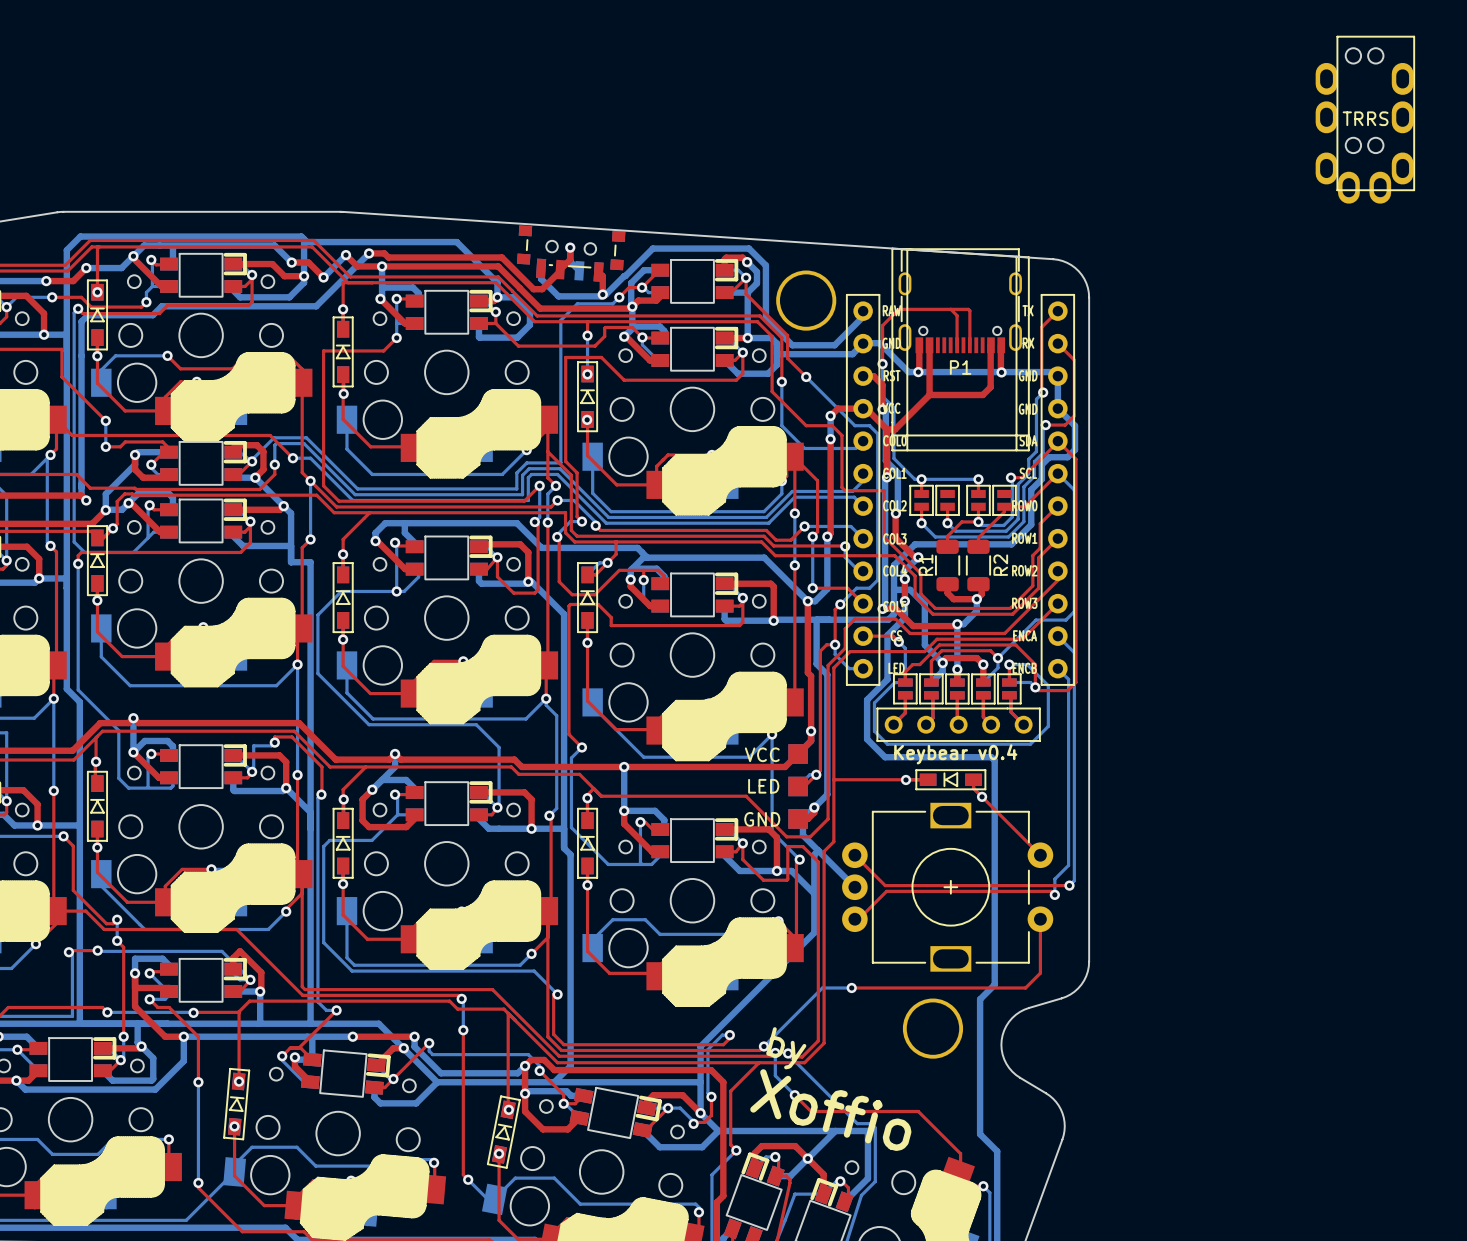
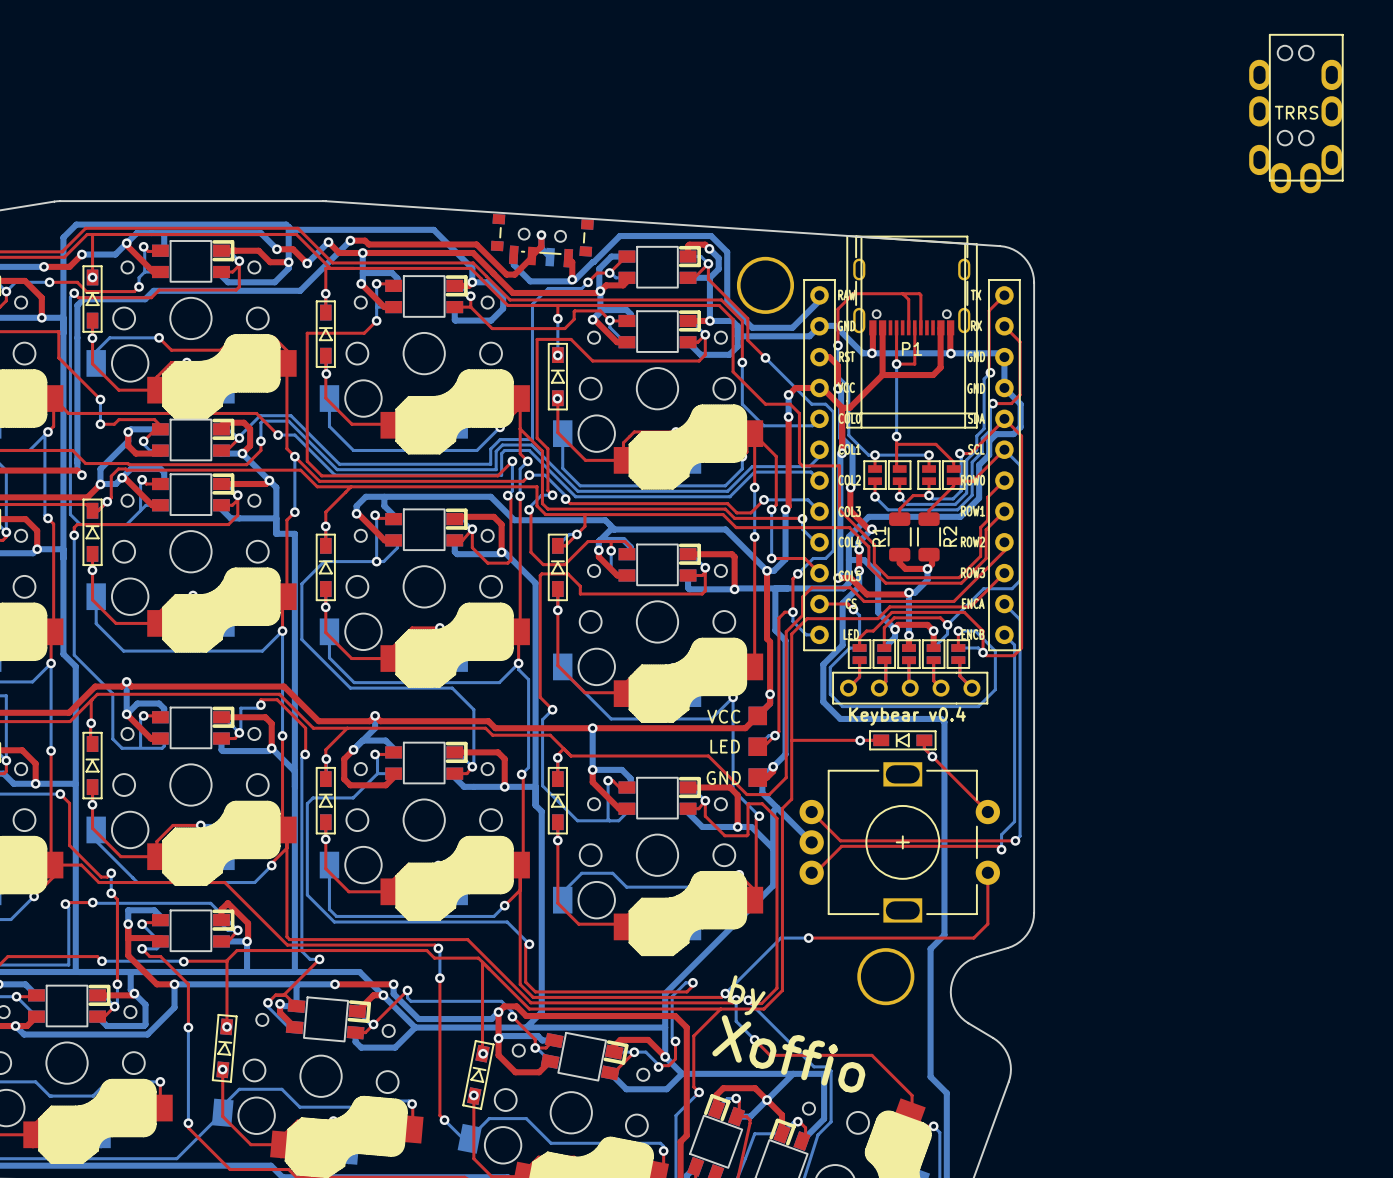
top track: none -> (896, 327) (896, 364) (914, 364) (914, 327)
bottom track: none -> (896, 364) (896, 436)
via: none -> (896, 364)
top track: none -> (896, 436) (896, 465) (899, 469)
via: none -> (896, 436)
top track: none -> (896, 444) (935, 444) (953, 462) (953, 469)

